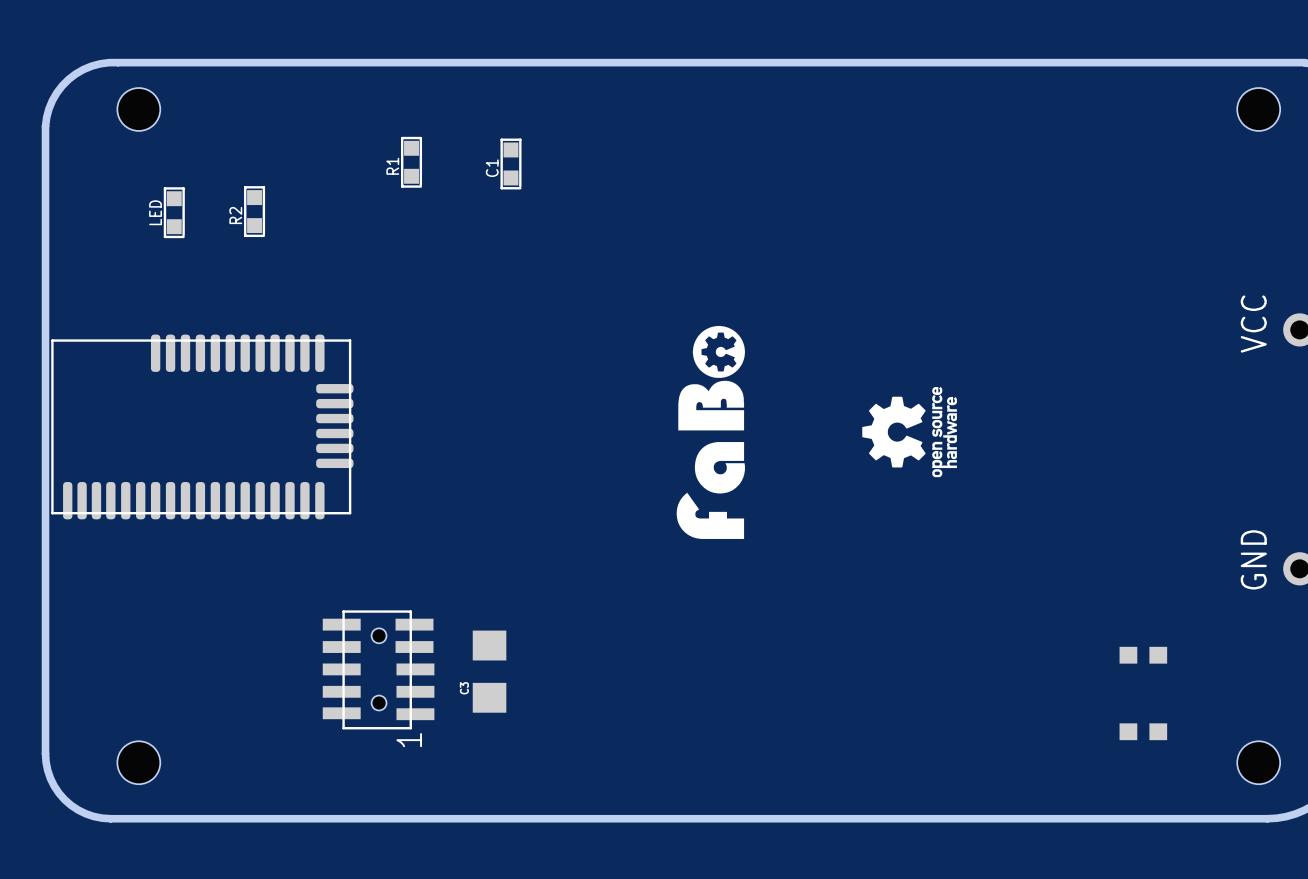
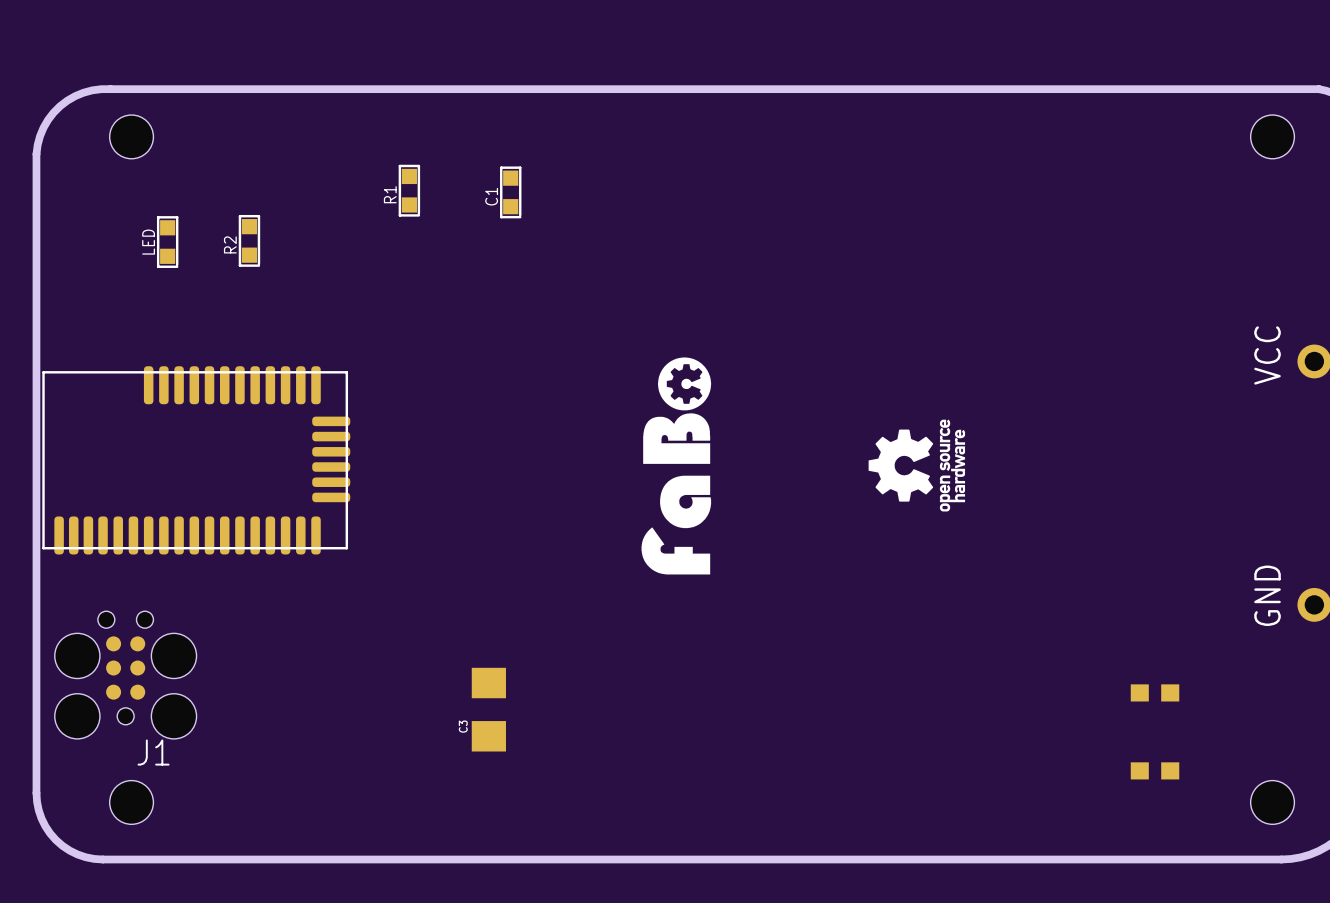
drawing position: (710, 432) -> (676, 465)
J1: none -> (125, 675)
part: (378, 669) -> none

